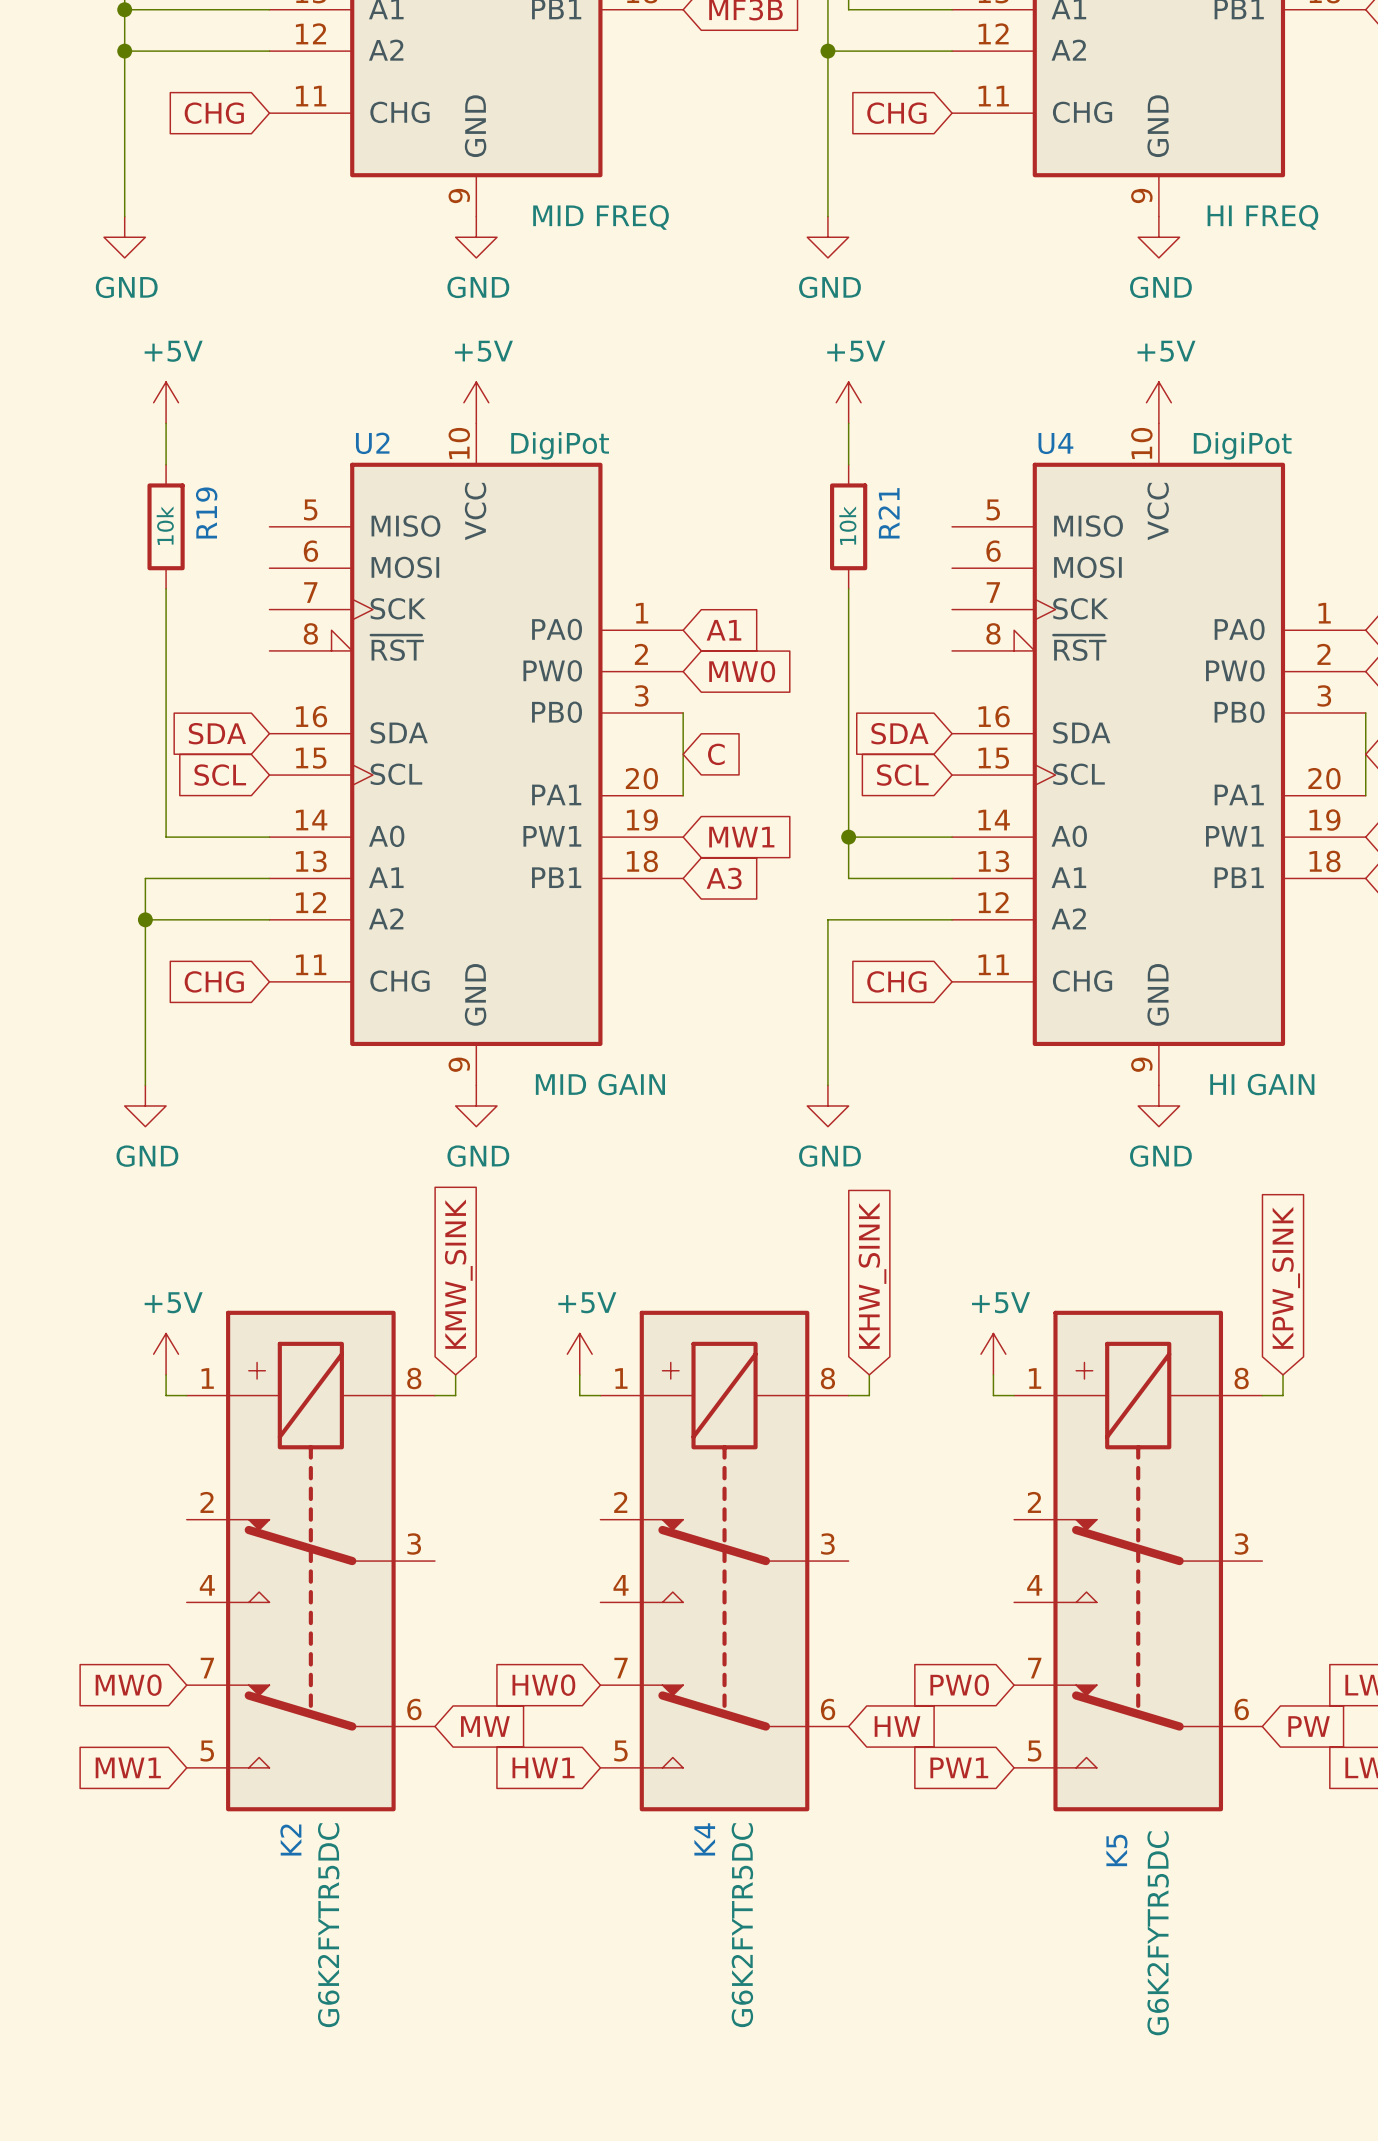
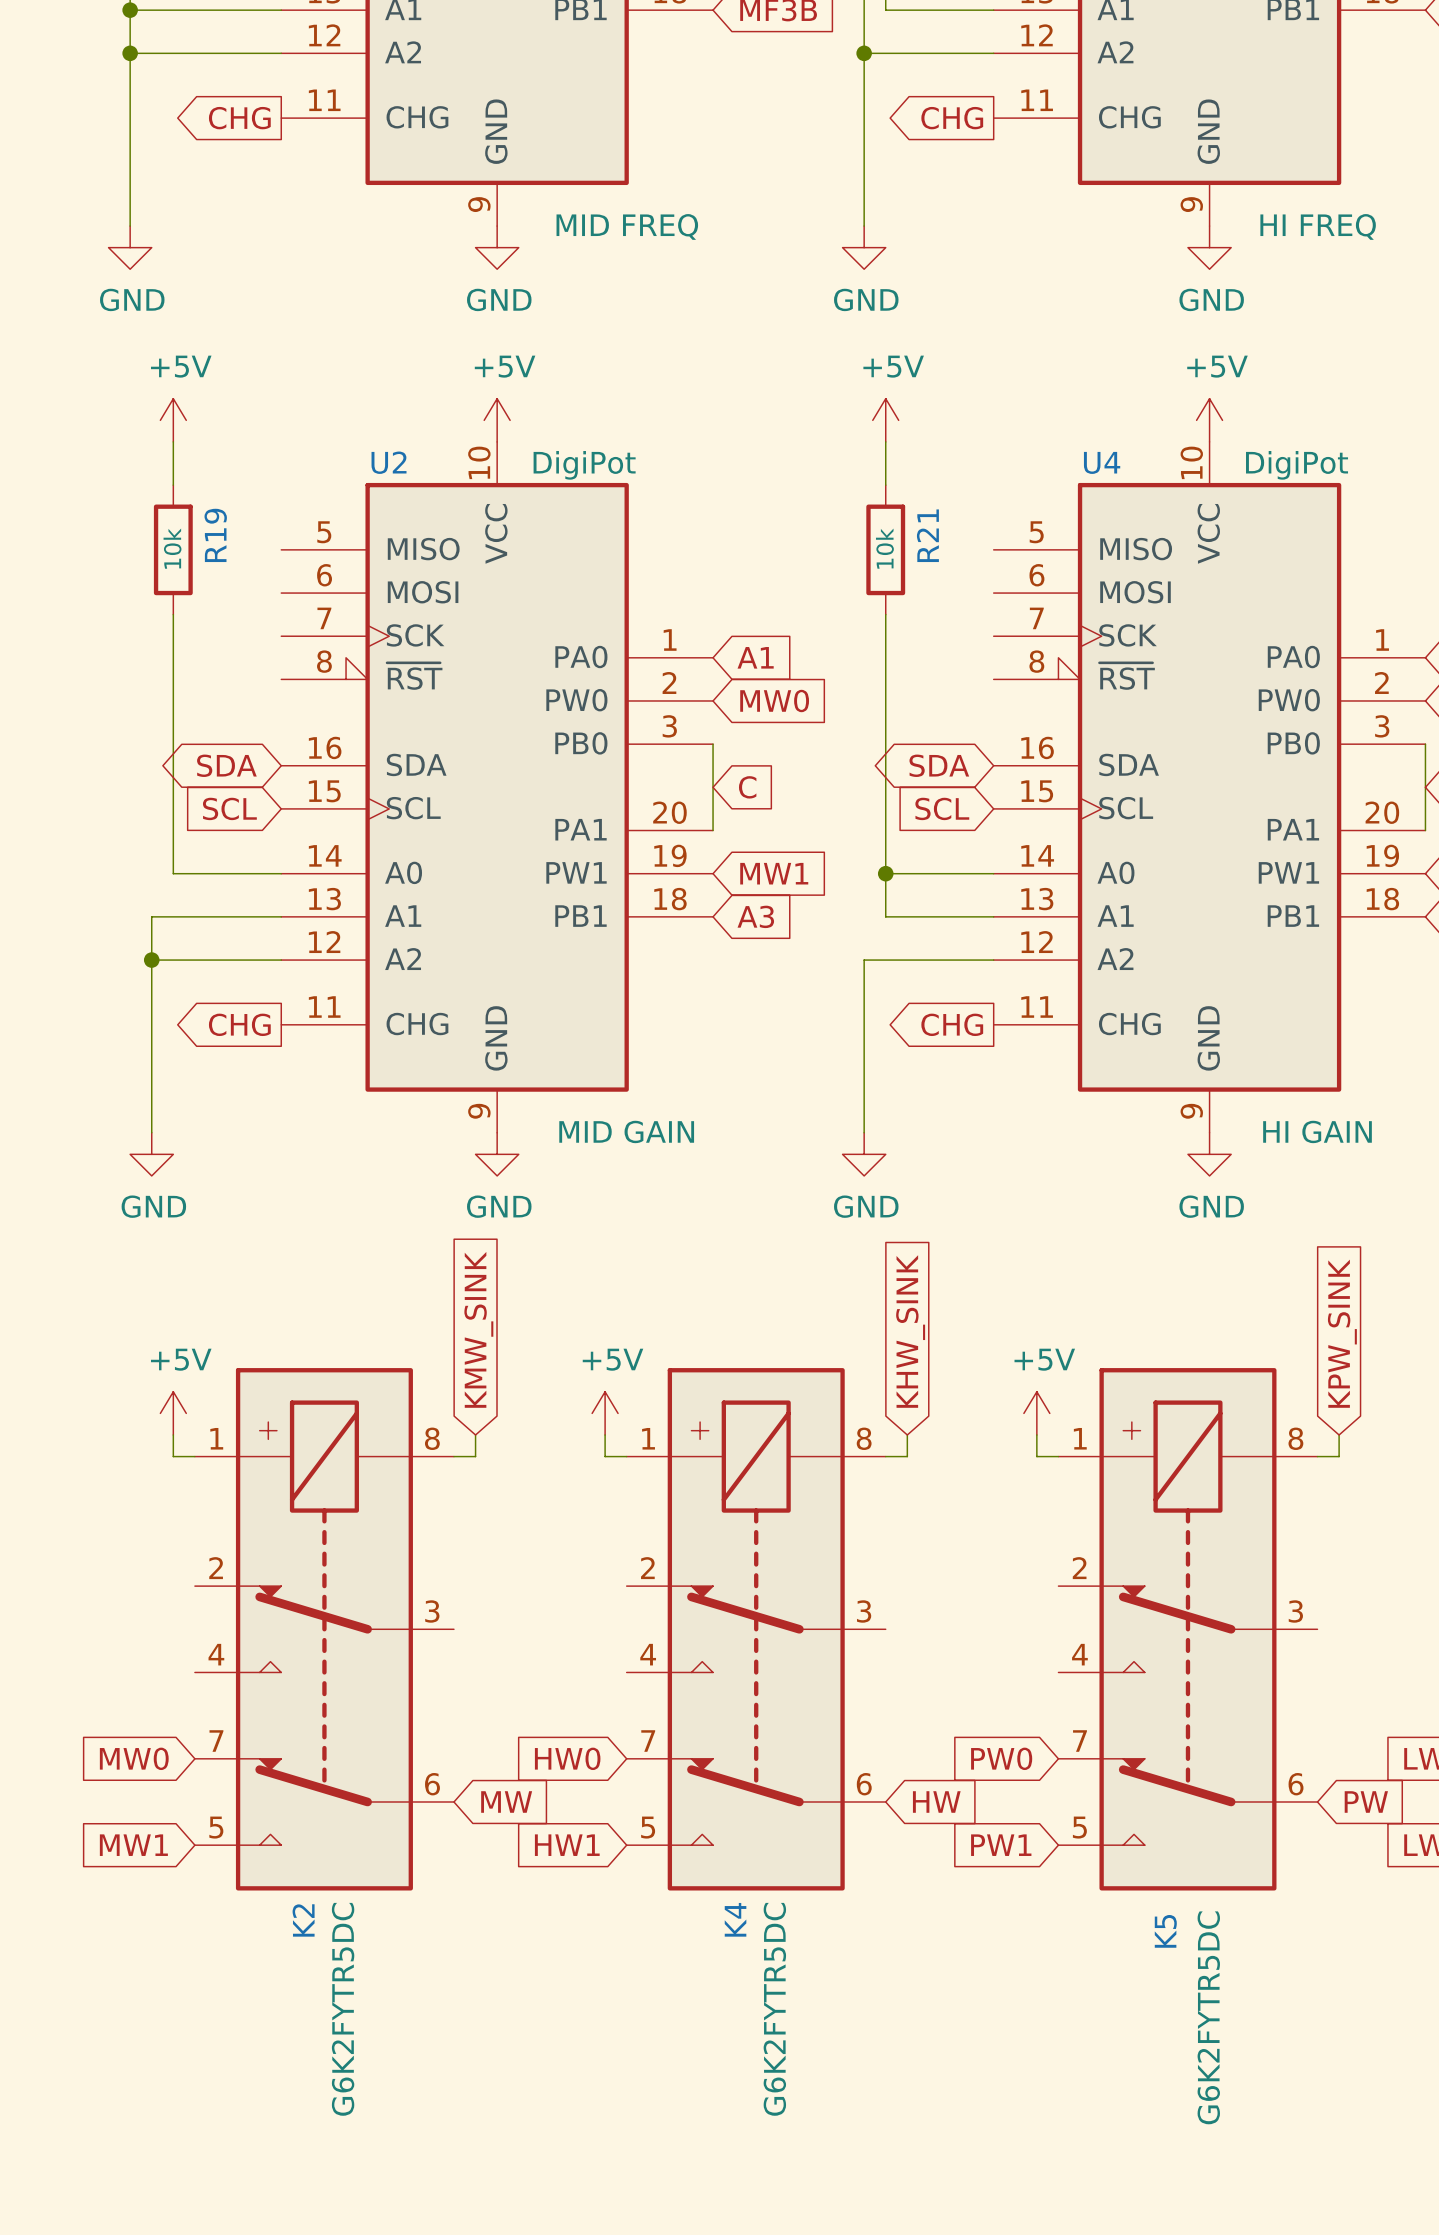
global label shape: input (214, 113) -> output (239, 118)
global label shape: input (896, 113) -> output (952, 118)
global label shape: input (217, 733) -> bidirectional (226, 765)
global label shape: input (899, 733) -> bidirectional (939, 765)
global label shape: input (214, 981) -> output (239, 1024)
global label shape: input (896, 981) -> output (952, 1024)

